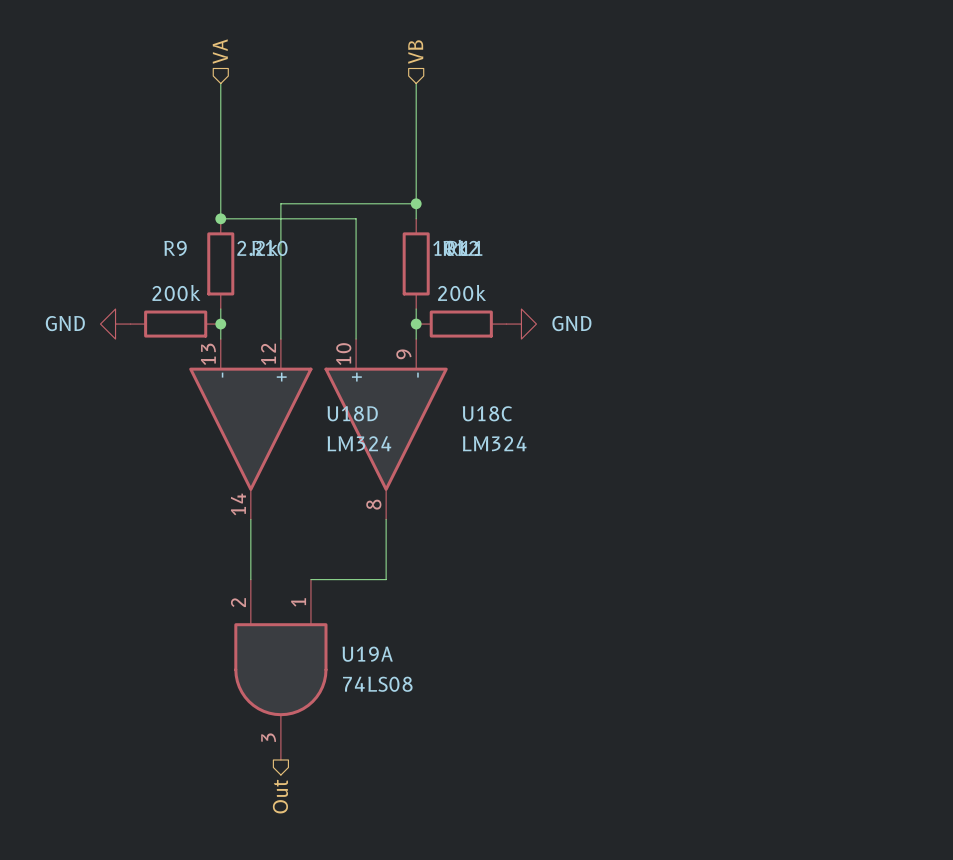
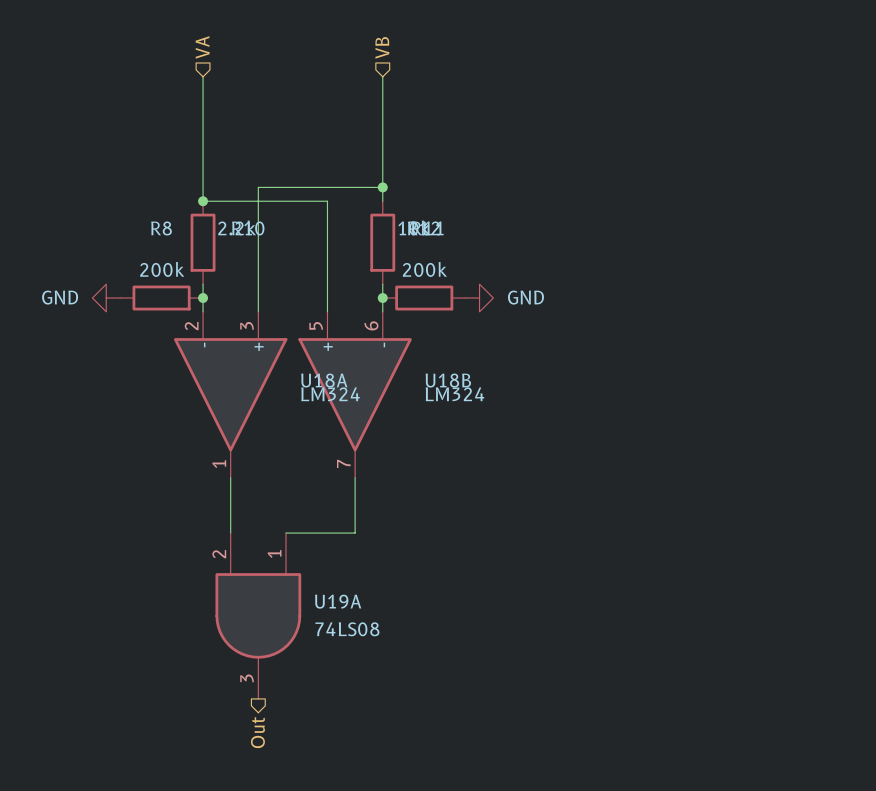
R9 name: R9 (175, 248) -> R8 (161, 228)
U18D pin number: 13 (208, 354) -> 2 (191, 326)
U18D pin number: 12 (268, 354) -> 3 (247, 325)
U18C pin number: 10 (343, 354) -> 5 (316, 325)
U18C pin number: 9 (403, 354) -> 6 (371, 325)
U18D name: U18D (352, 413) -> U18A (324, 380)
U18C name: U18C (487, 413) -> U18B (448, 380)
U18D value position: LM324 (359, 443) -> LM324 (330, 394)
U18C value position: LM324 (494, 443) -> LM324 (454, 394)
U18D pin number: 14 (238, 504) -> 1 (219, 464)
U18C pin number: 8 (373, 504) -> 7 (343, 463)

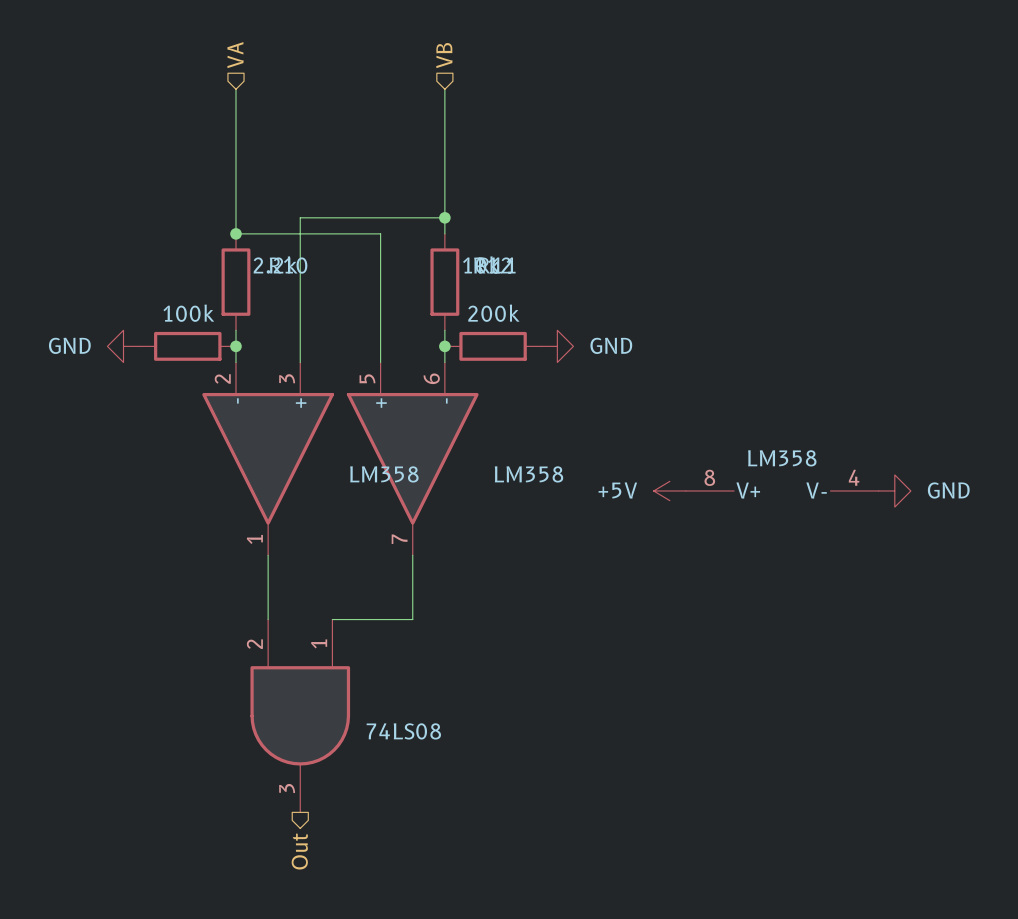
R8 name: R8 (161, 228) -> none
R8 value: 200k (162, 269) -> 100k (188, 313)
U18A name: U18A (324, 380) -> none
U18B name: U18B (448, 380) -> none
U18A value: LM324 (330, 394) -> LM358 (384, 474)
U18B value: LM324 (454, 394) -> LM358 (528, 474)
power symbol: none -> +5V (669, 490)
part: none -> LM358 (782, 490)
power symbol: none -> GND (894, 490)
U19A name: U19A (338, 601) -> none

